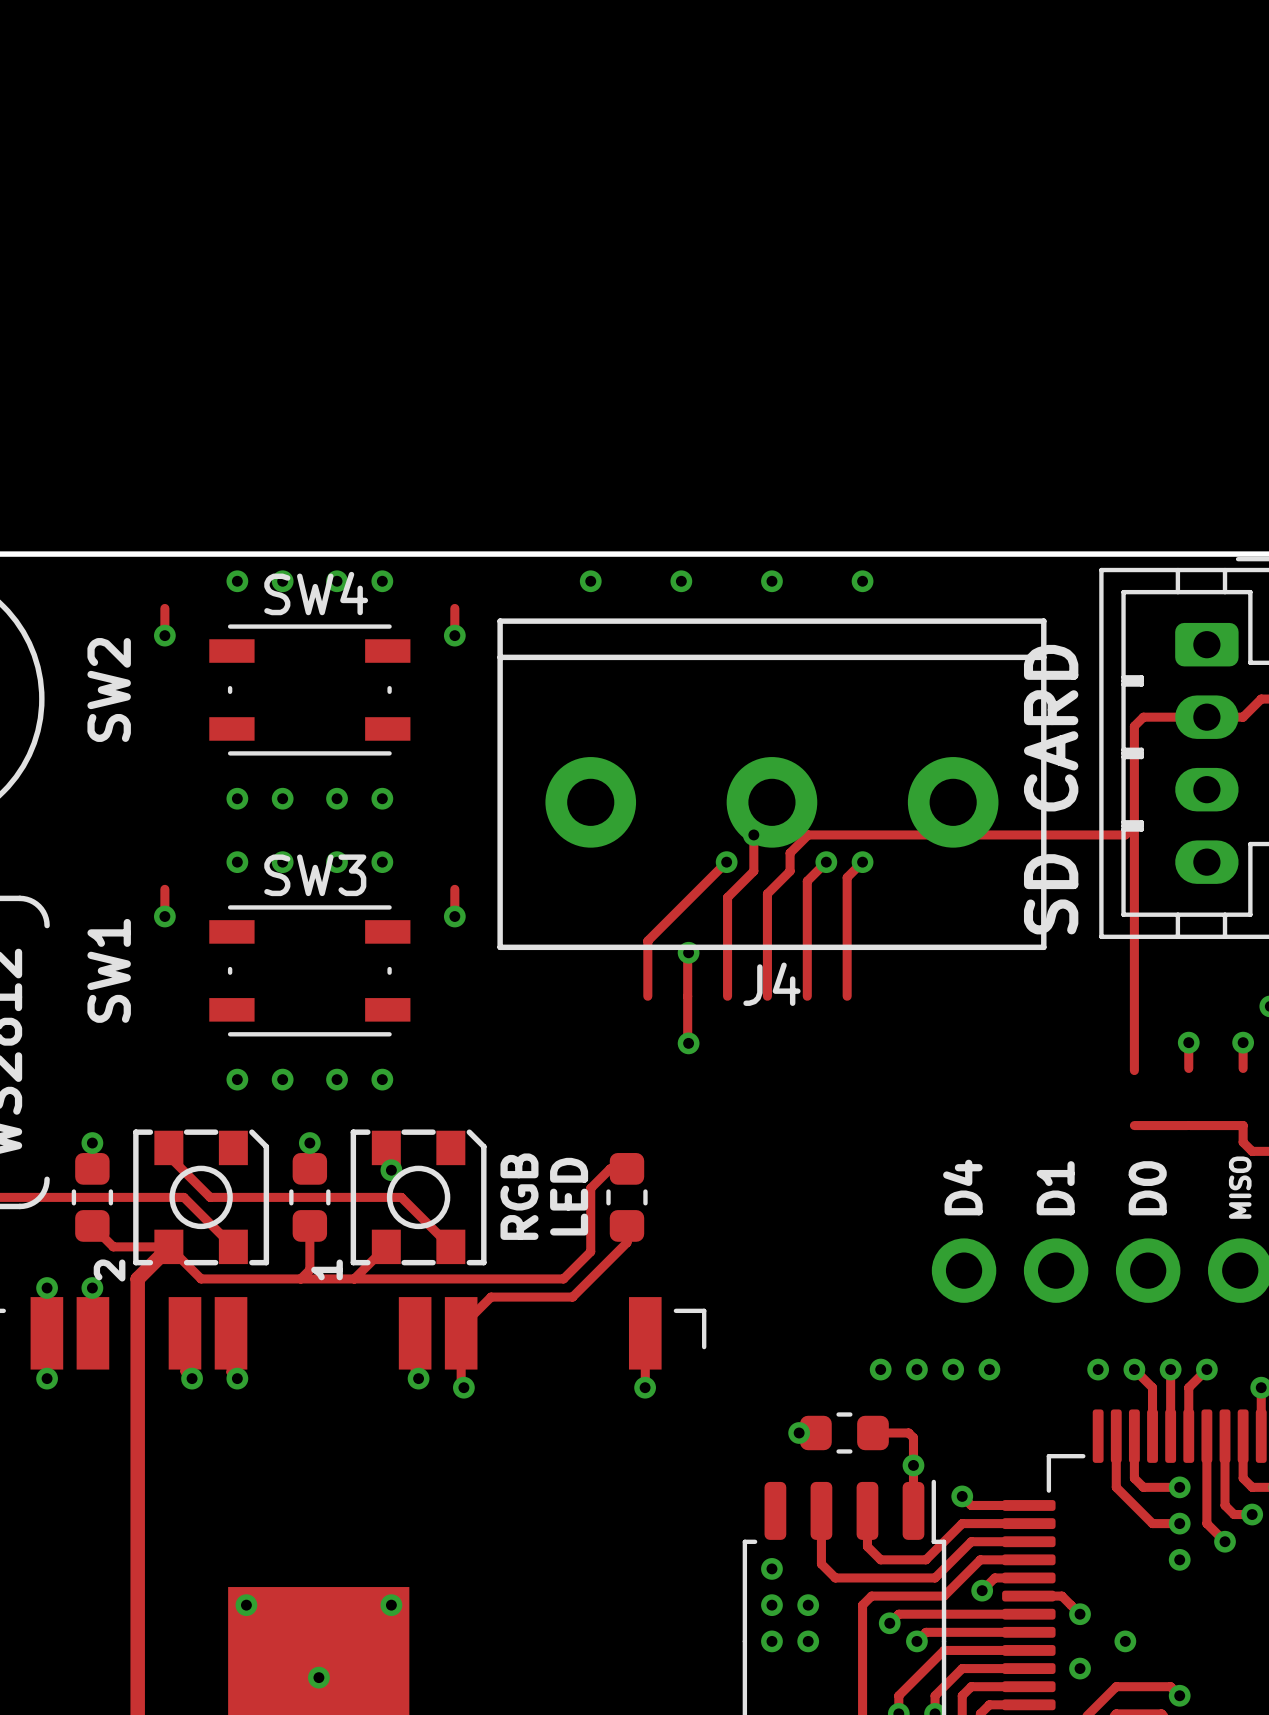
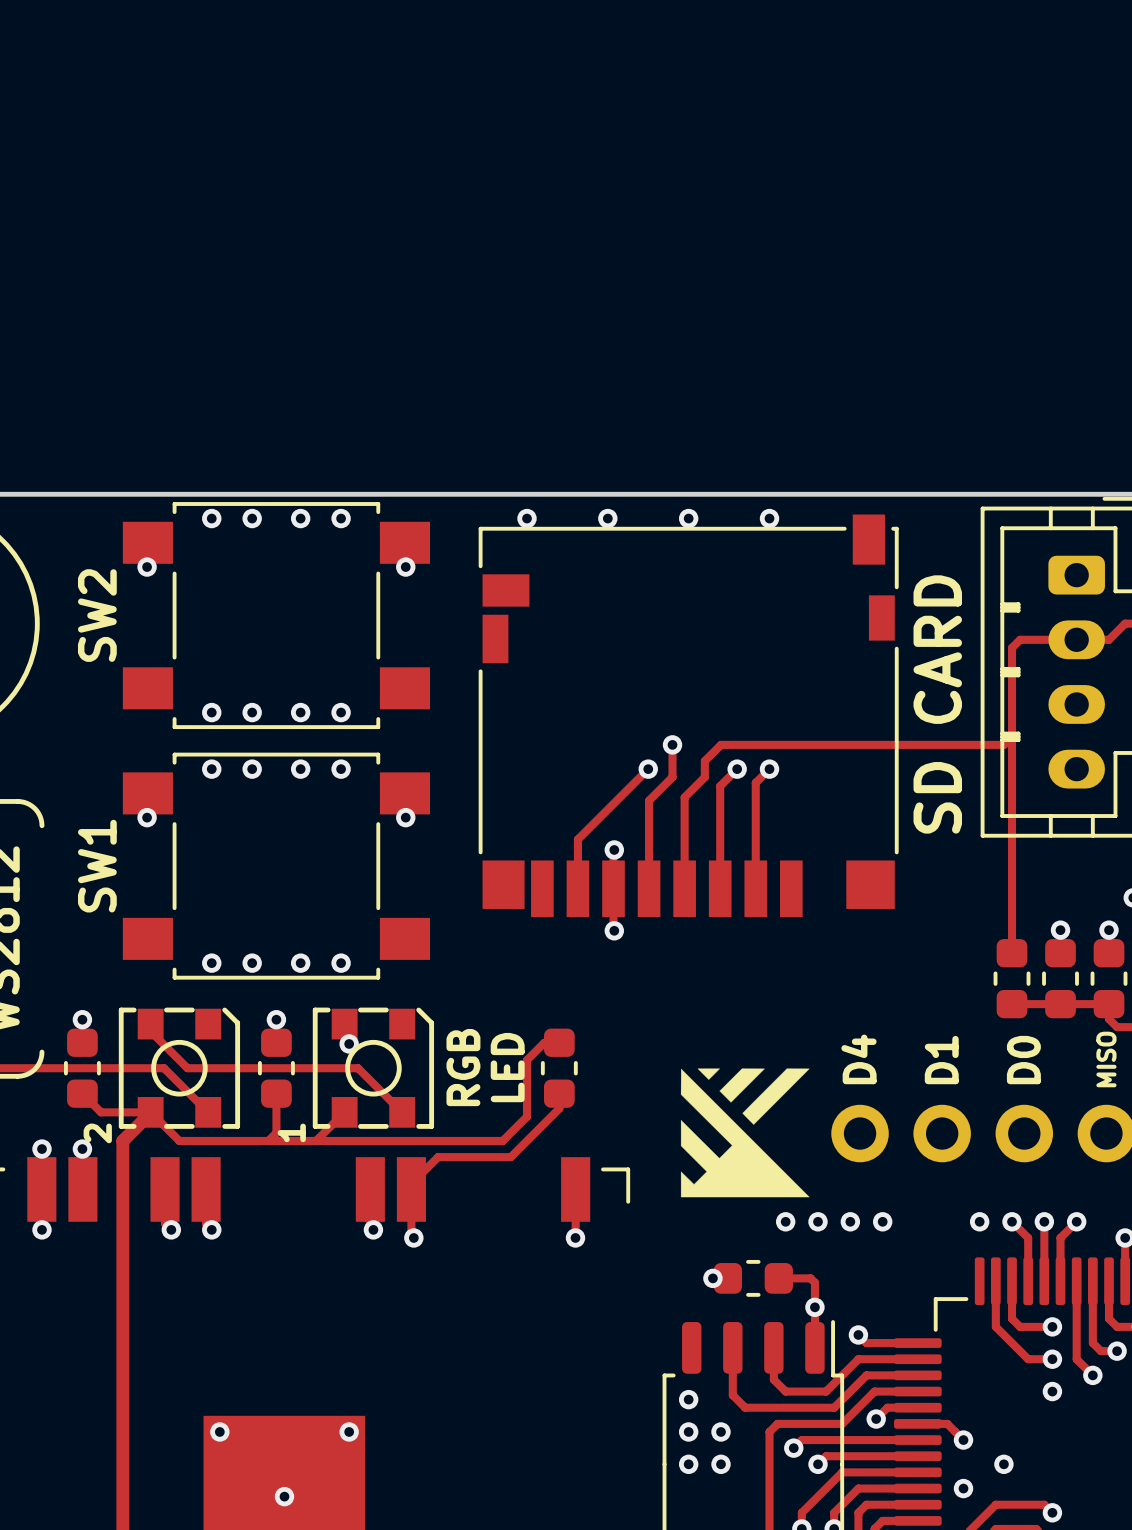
SW4: (309, 689) -> none
part: none -> (276, 615)
J4: (771, 784) -> none
part: none -> (688, 715)
SW3: (309, 970) -> none
part: none -> (276, 866)
part: none -> (1012, 978)
part: none -> (1060, 978)
part: none -> (1109, 978)
drawing: none -> [680, 1068, 810, 1198]

